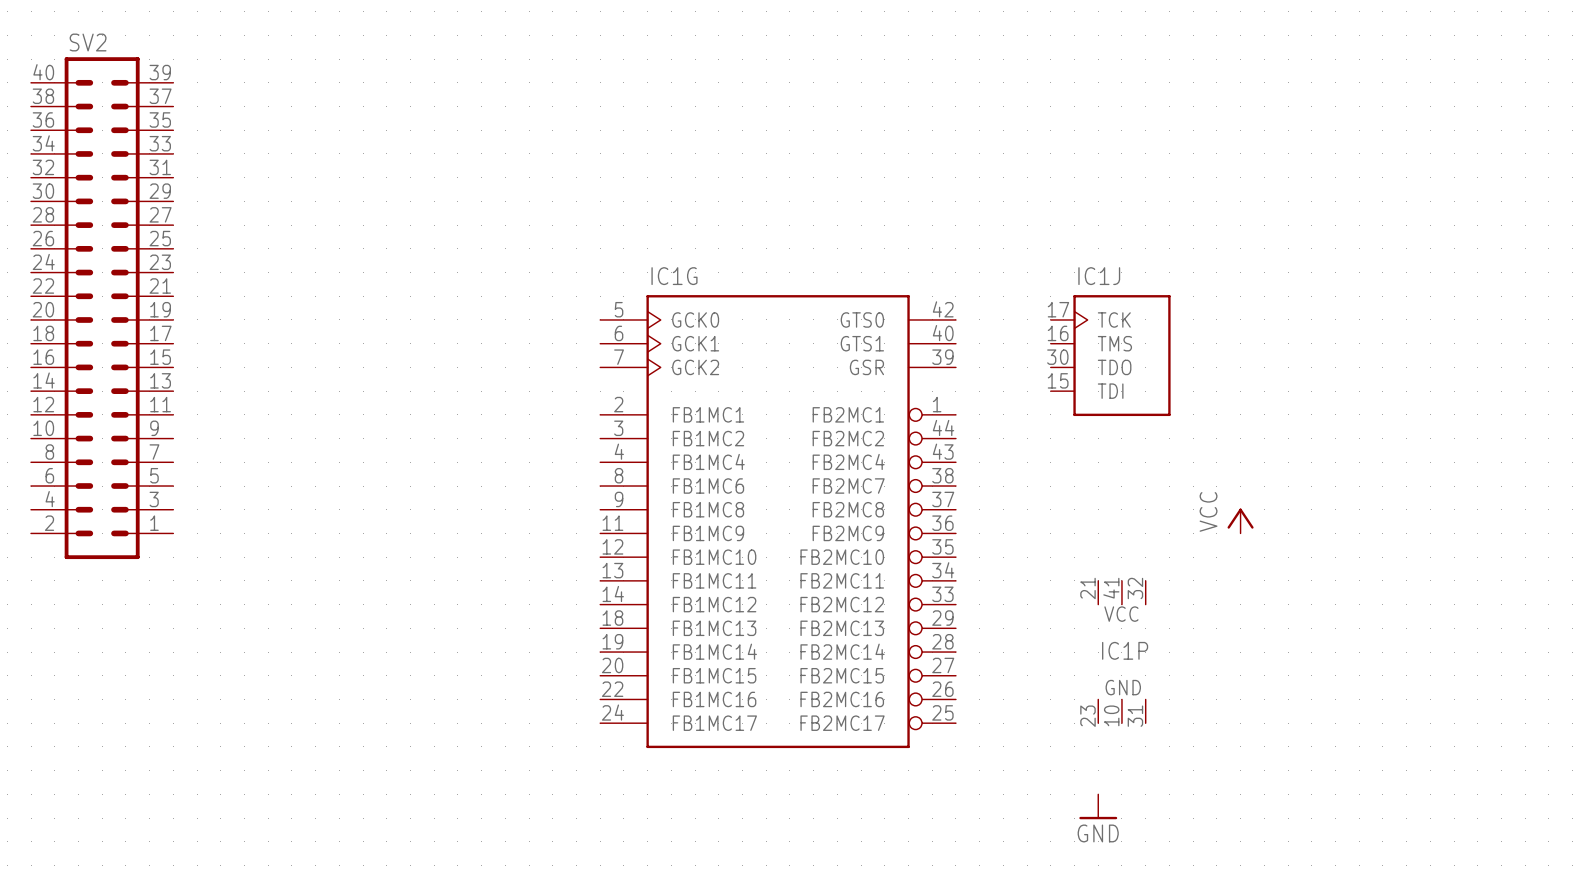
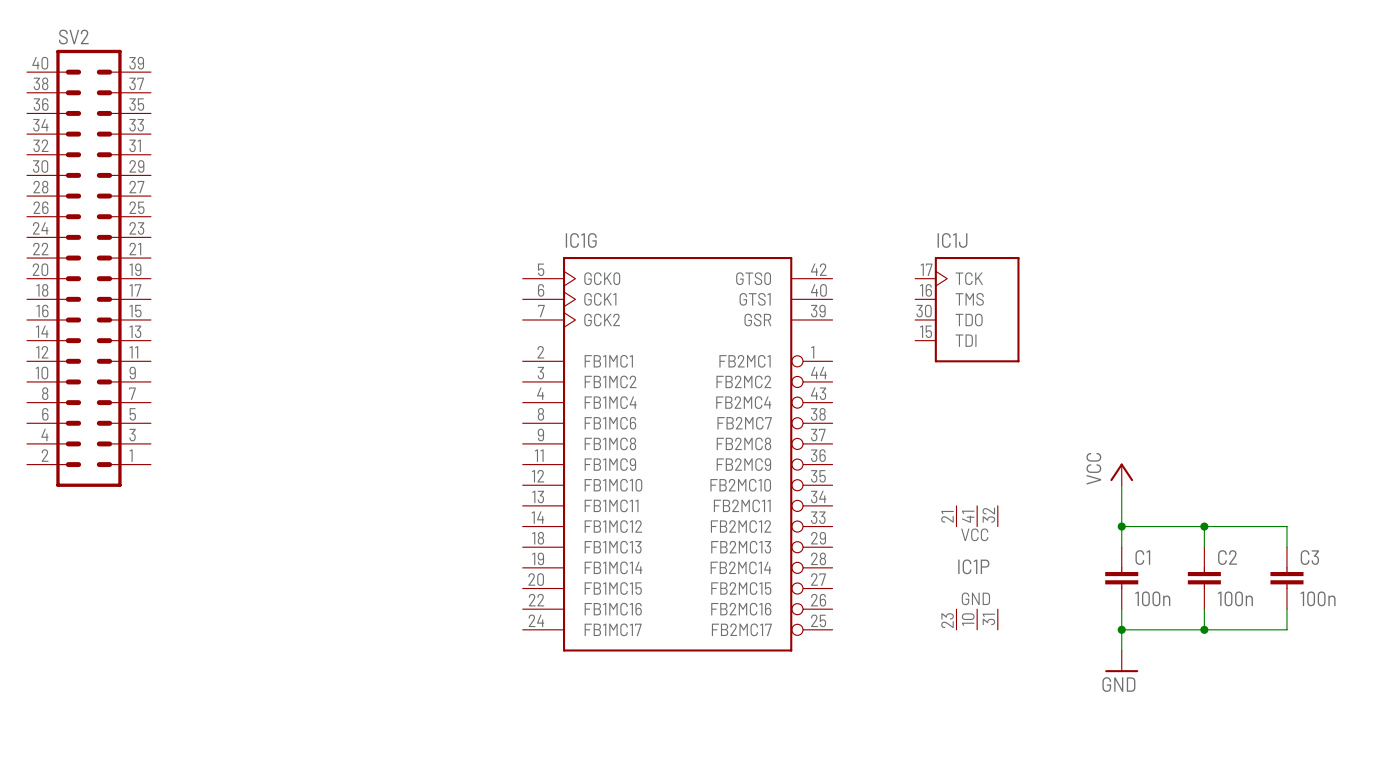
power symbol position: VCC (1240, 520) -> VCC (1121, 474)
wire: none -> (1121, 485) (1121, 547)
wire: none -> (1121, 526) (1286, 526) (1286, 547)
junction: none -> (1121, 526)
wire: none -> (1204, 526) (1204, 547)
junction: none -> (1204, 526)
C1: none -> 100n (1121, 578)
C2: none -> 100n (1204, 578)
C3: none -> 100n (1286, 578)
wire: none -> (1121, 609) (1121, 650)
wire: none -> (1204, 609) (1204, 629)
wire: none -> (1286, 609) (1286, 629) (1121, 629)
junction: none -> (1121, 629)
junction: none -> (1204, 629)
power symbol position: GND (1098, 806) -> GND (1121, 661)

